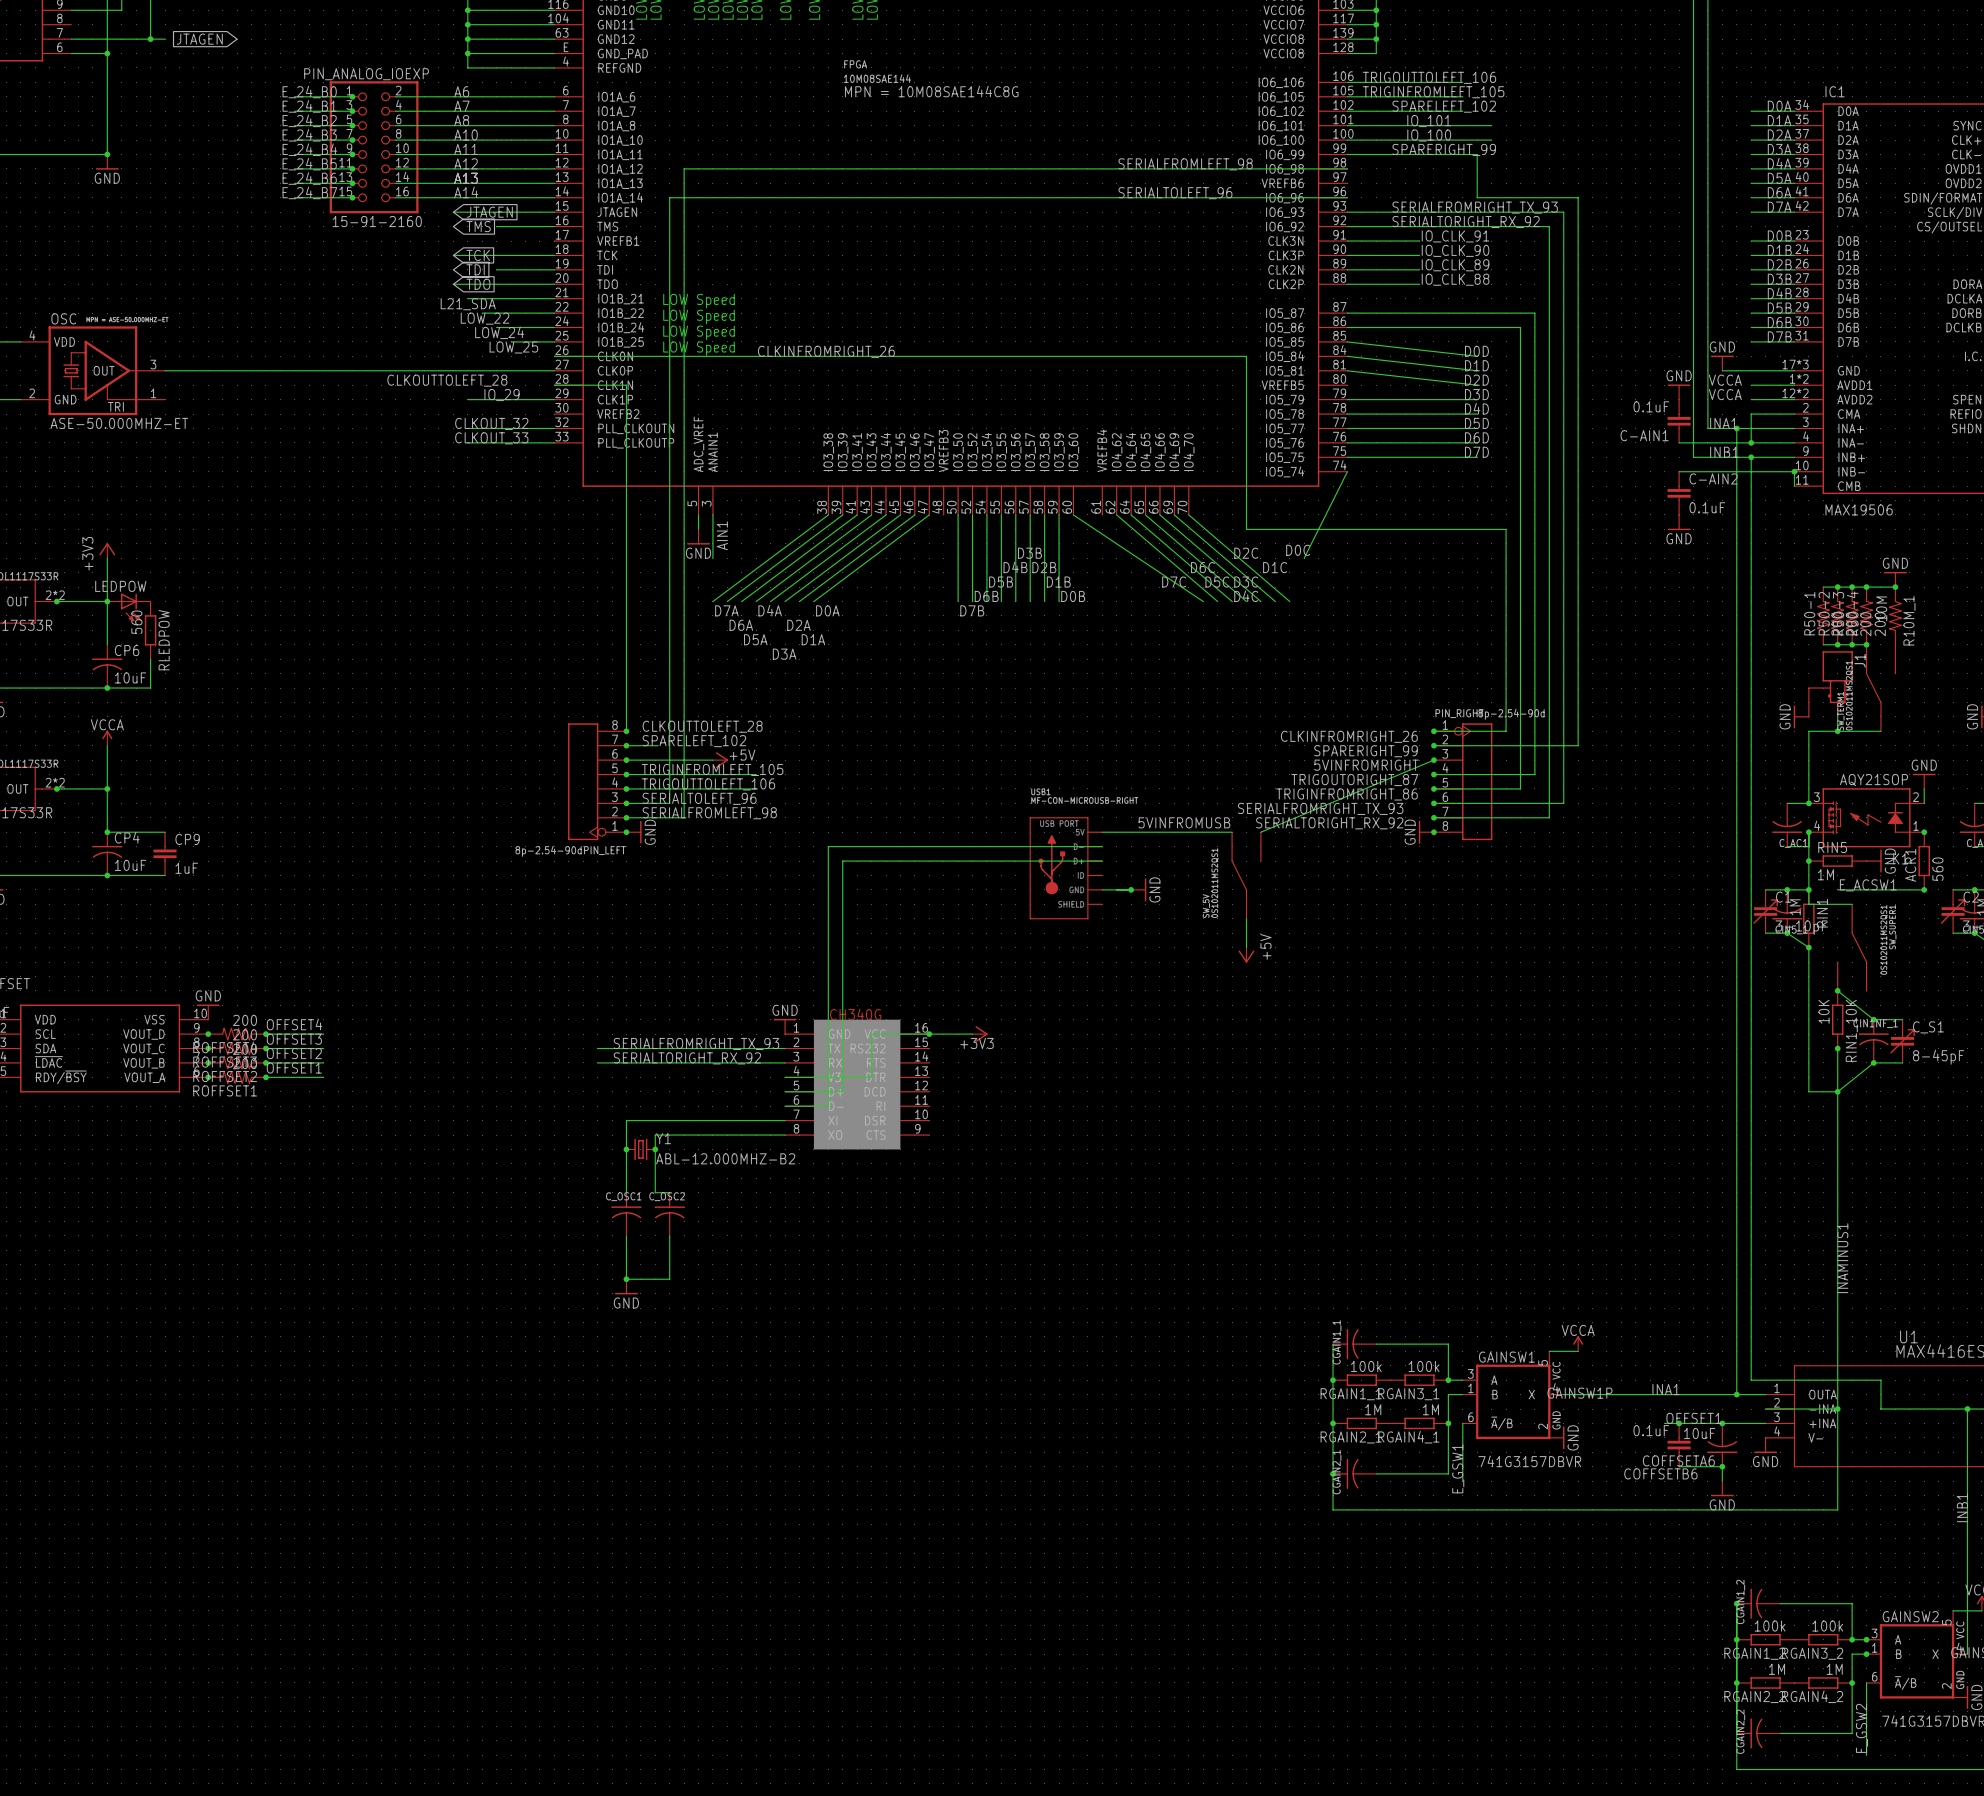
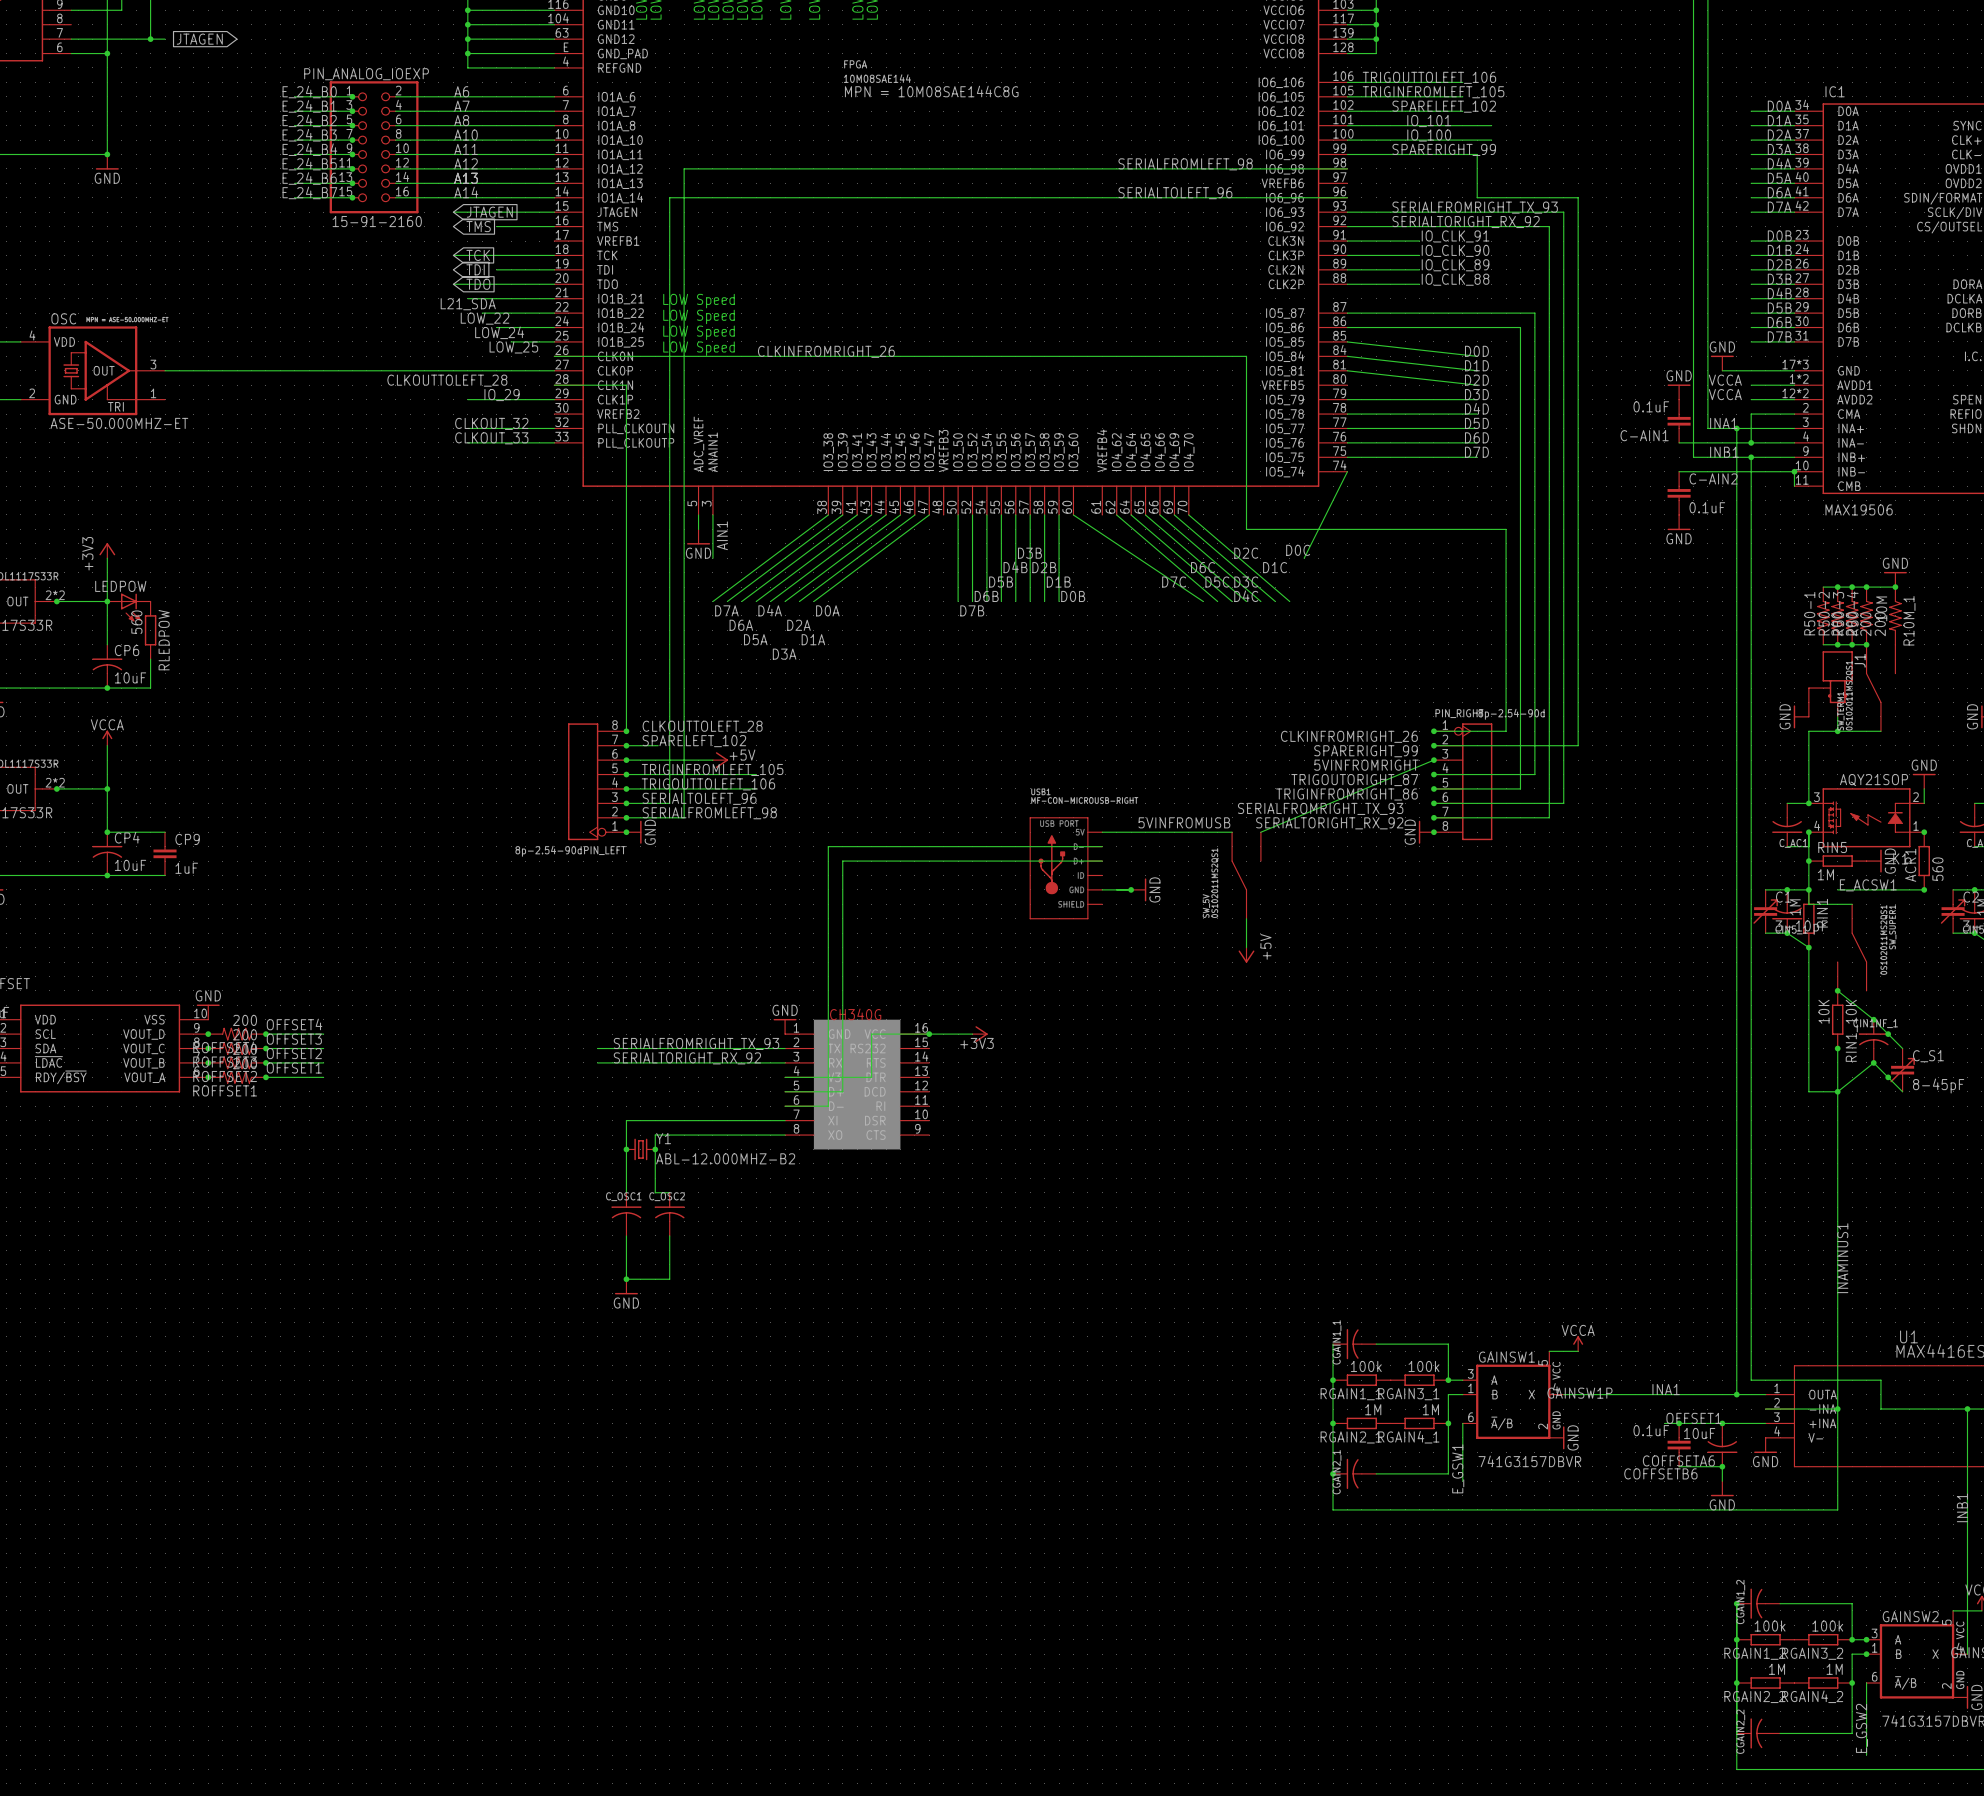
wire: (1873, 1019) (1902, 1019) -> (1873, 1019) (1902, 1048)
junction: none -> (1888, 1034)
C_S1 position: (1902, 1041) -> (1902, 1070)
wire: (1873, 1062) (1902, 1062) -> (1873, 1062) (1902, 1091)
junction: none -> (1888, 1077)

